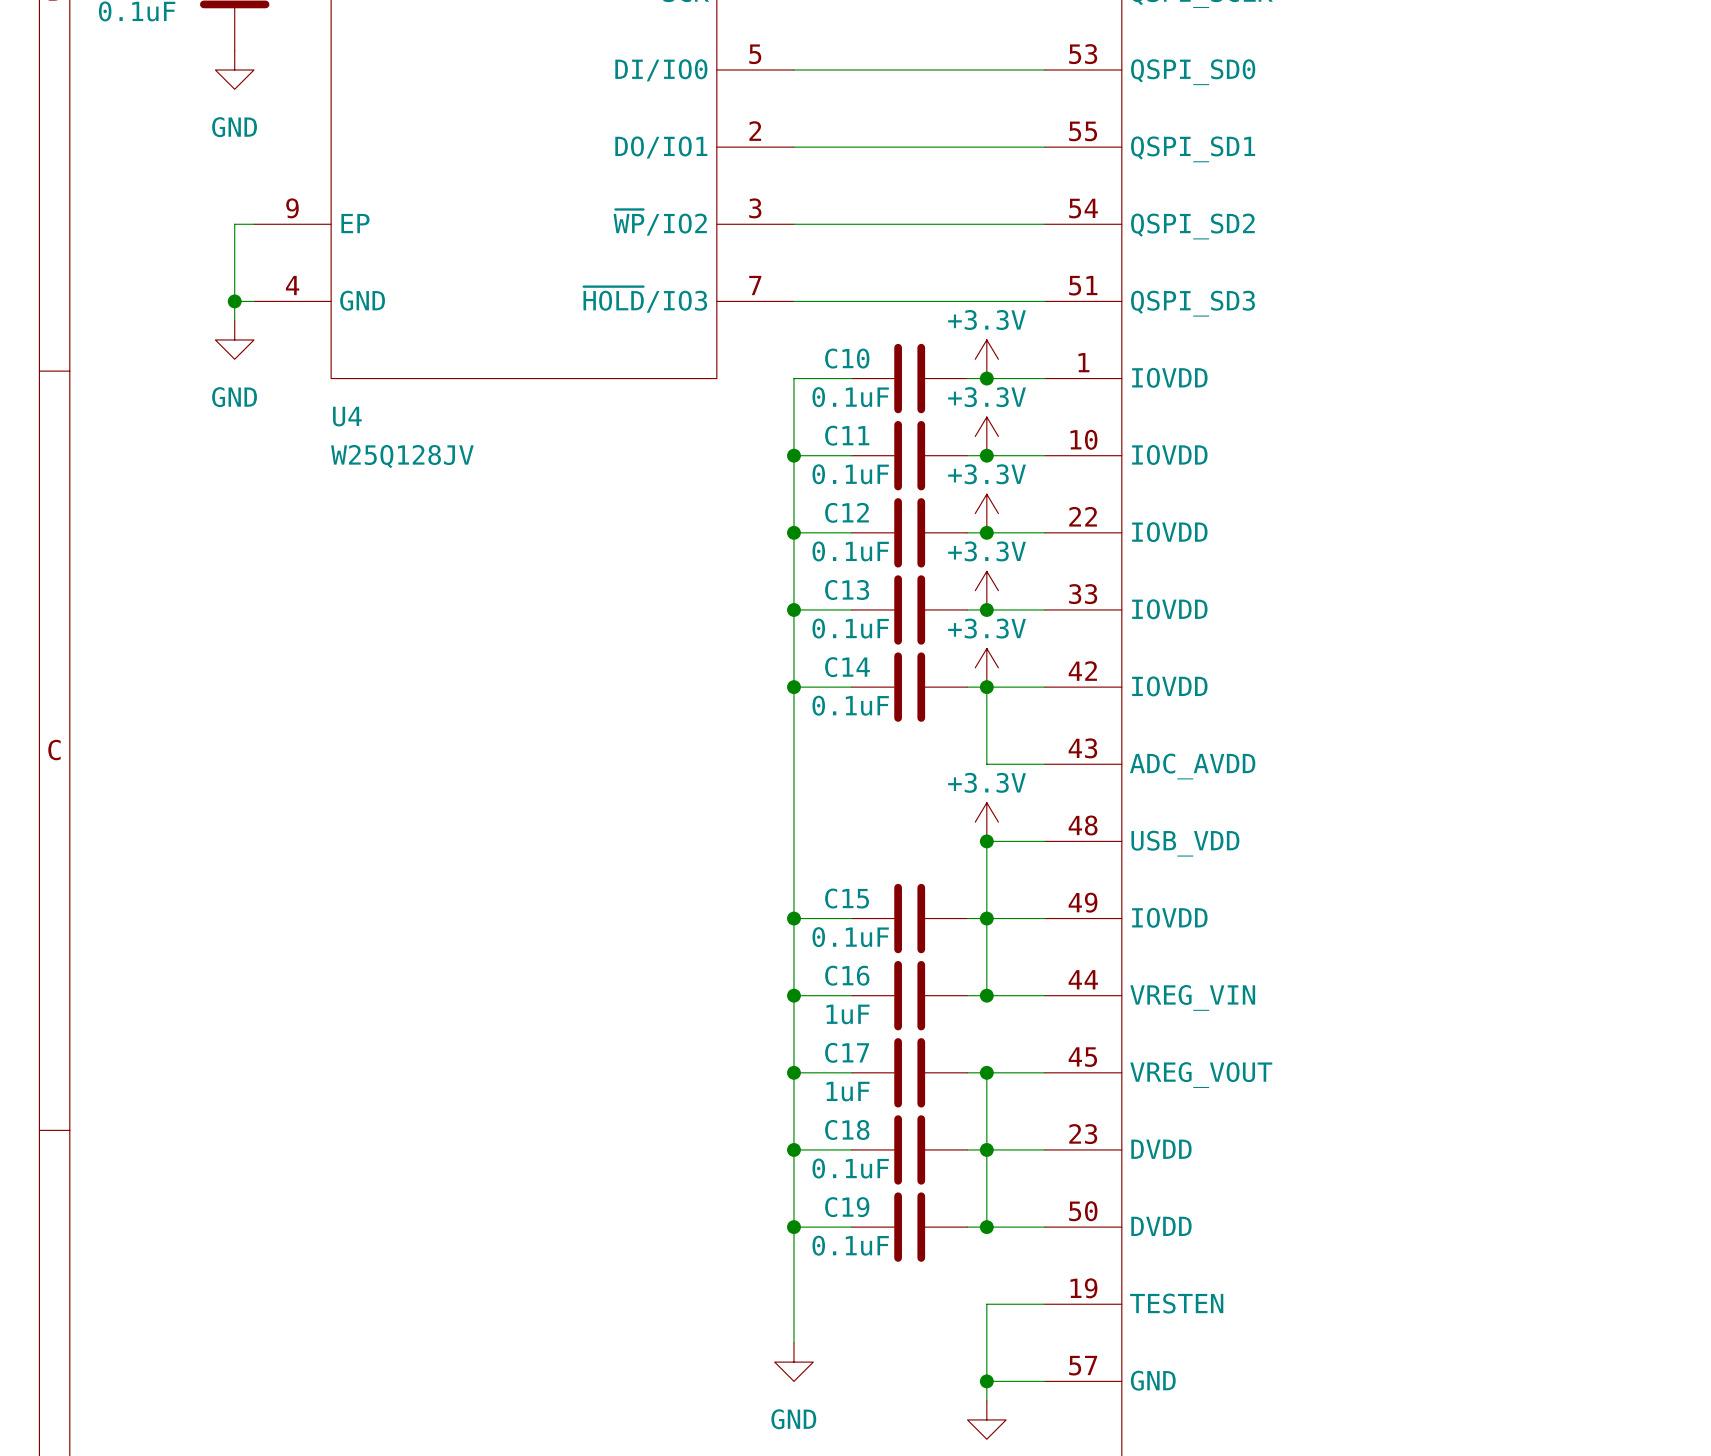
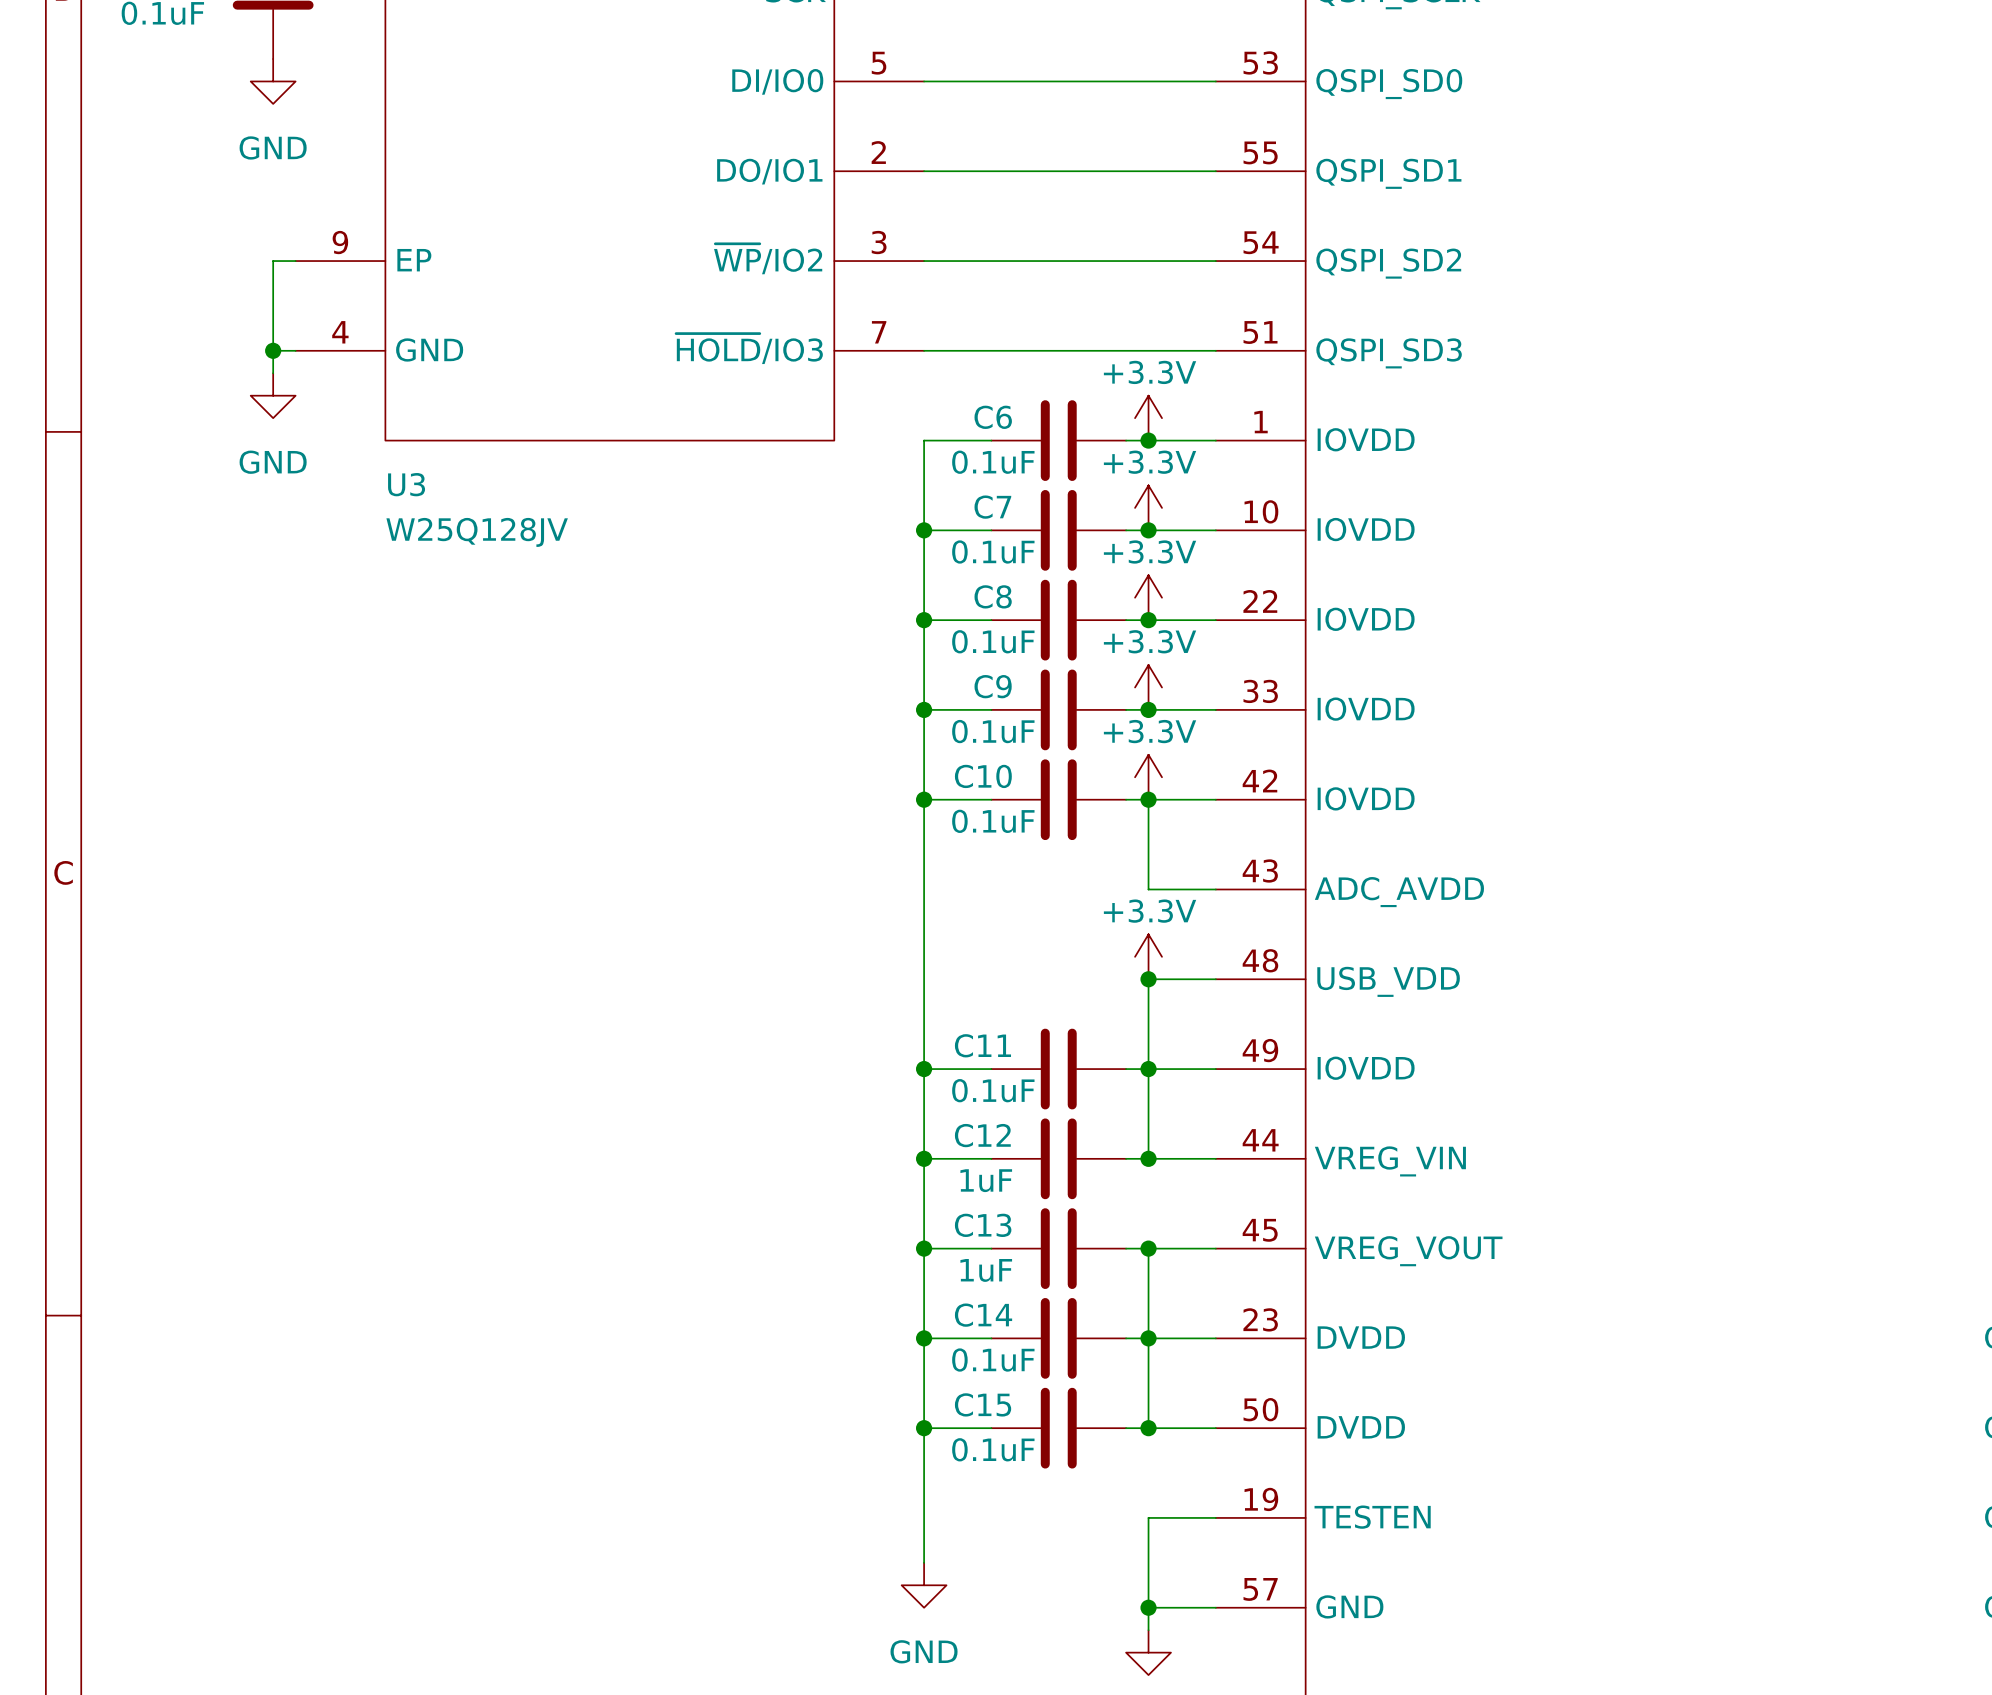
C10 name: C10 (847, 358) -> C6 (993, 417)
U4 name: U4 (347, 416) -> U3 (406, 484)
C11 name: C11 (847, 435) -> C7 (992, 507)
C12 name: C12 (847, 512) -> C8 (993, 596)
C13 name: C13 (847, 589) -> C9 (993, 686)
C14 name: C14 (847, 667) -> C10 (983, 776)
C15 name: C15 (847, 898) -> C11 (982, 1045)
C16 name: C16 (847, 975) -> C12 (982, 1135)
C17 name: C17 (847, 1052) -> C13 (983, 1225)
C18 name: C18 (847, 1129) -> C14 (983, 1315)
C19 name: C19 (847, 1207) -> C15 (983, 1404)

